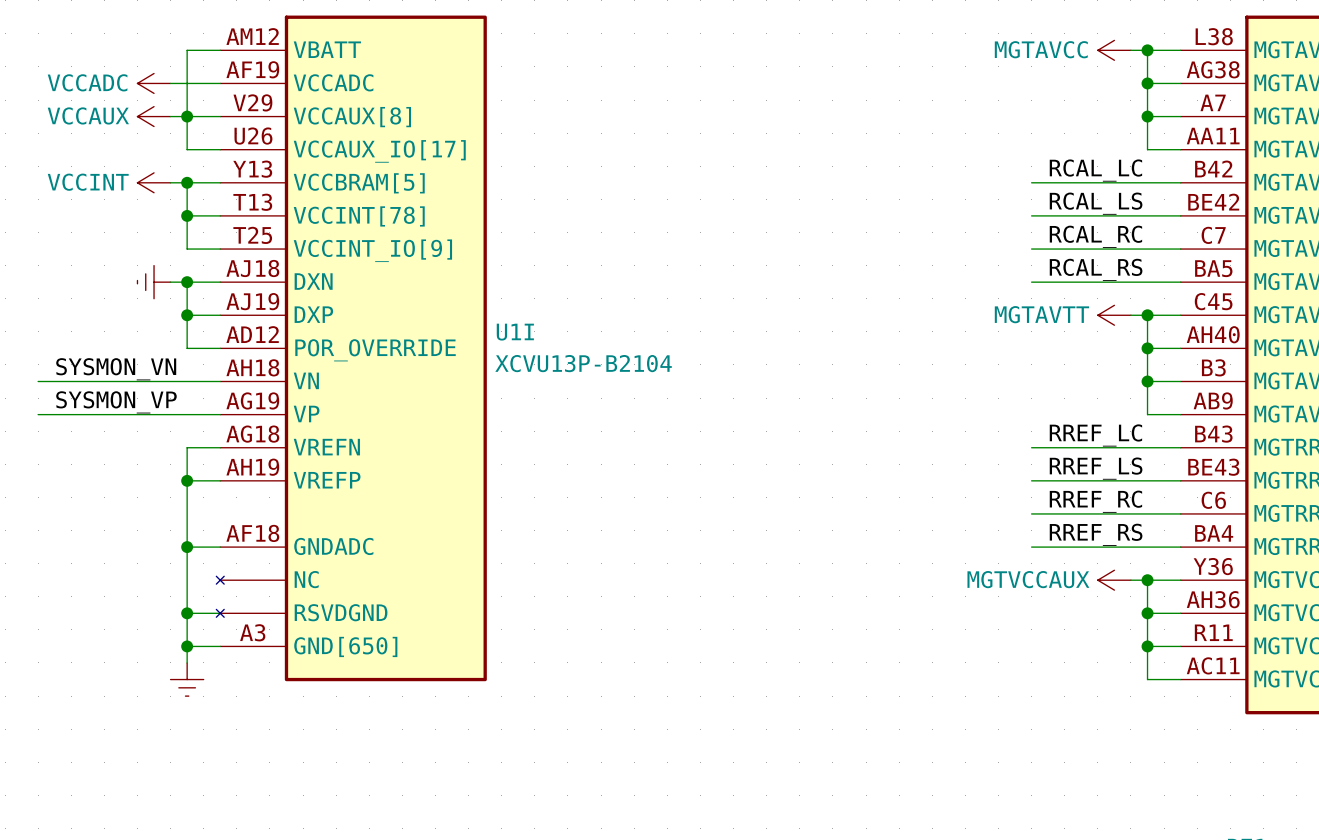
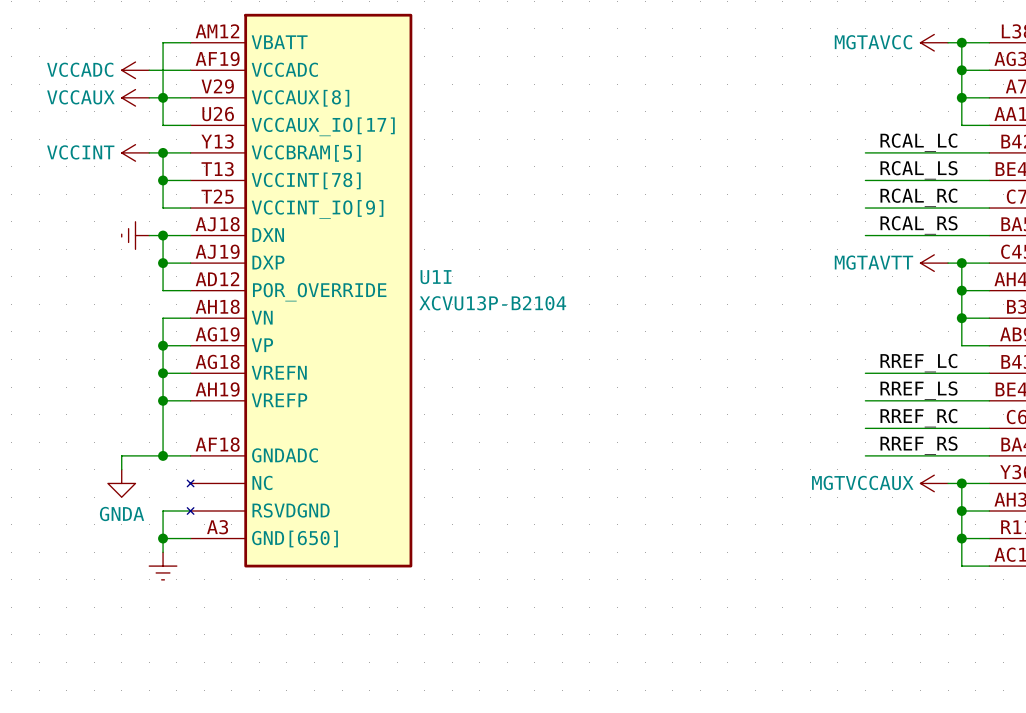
label: SYSMON_VN (116, 369) -> none
wire: (38, 381) (187, 381) -> (163, 373) (163, 318)
label: SYSMON_VP (116, 402) -> none
wire: (38, 414) (187, 414) -> none
junction: none -> (163, 345)
junction: none -> (163, 373)
wire: (187, 547) (187, 613) -> (163, 455) (121, 455) (121, 469)
power symbol: none -> GNDA (121, 483)
junction: (187, 613) -> none

